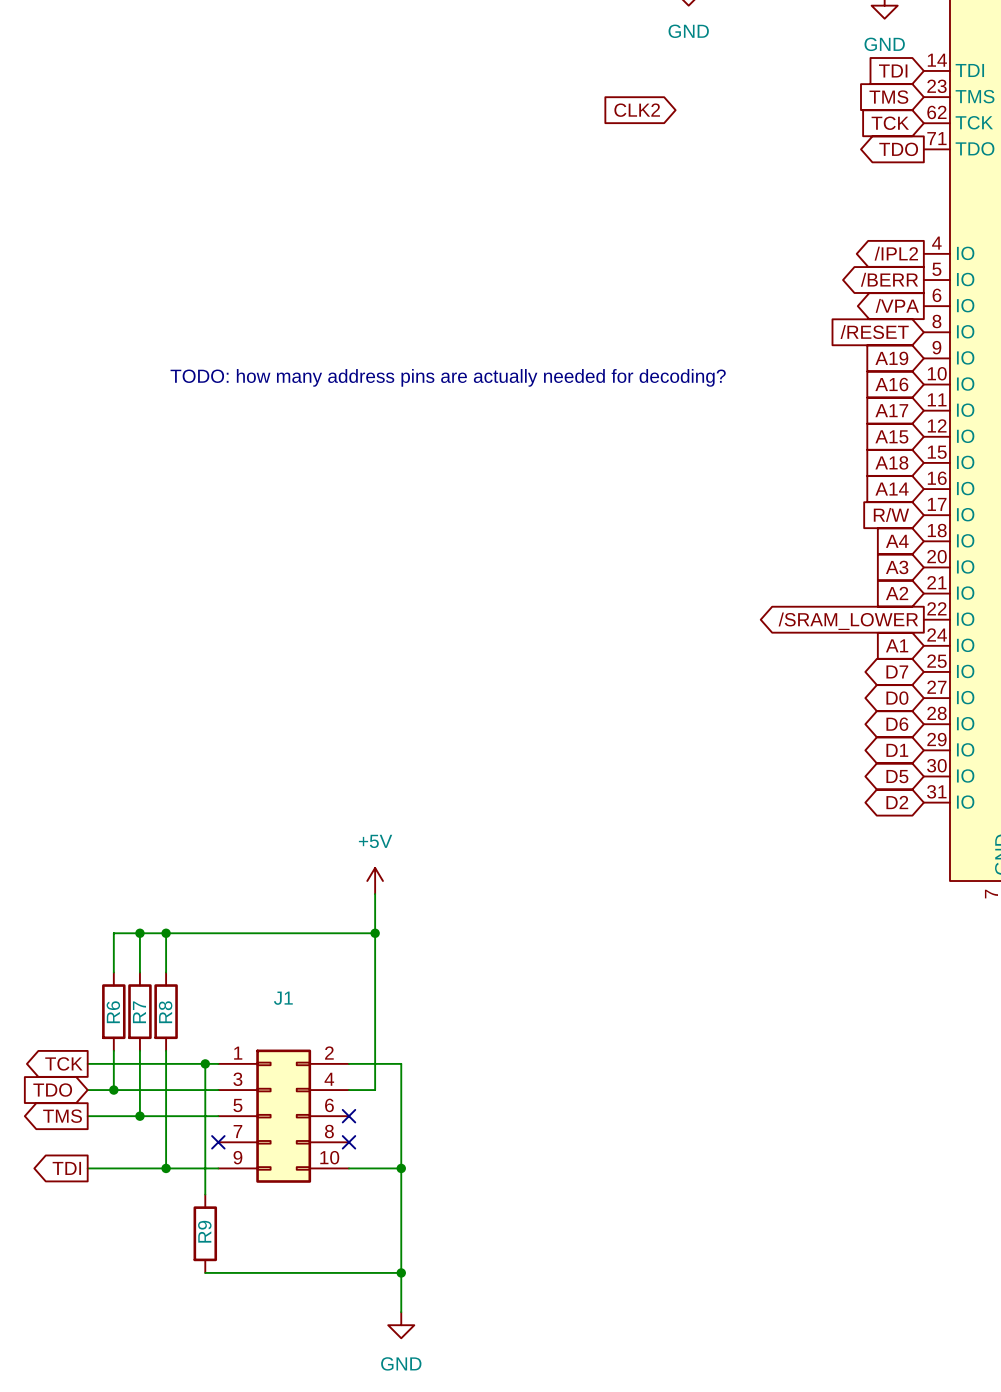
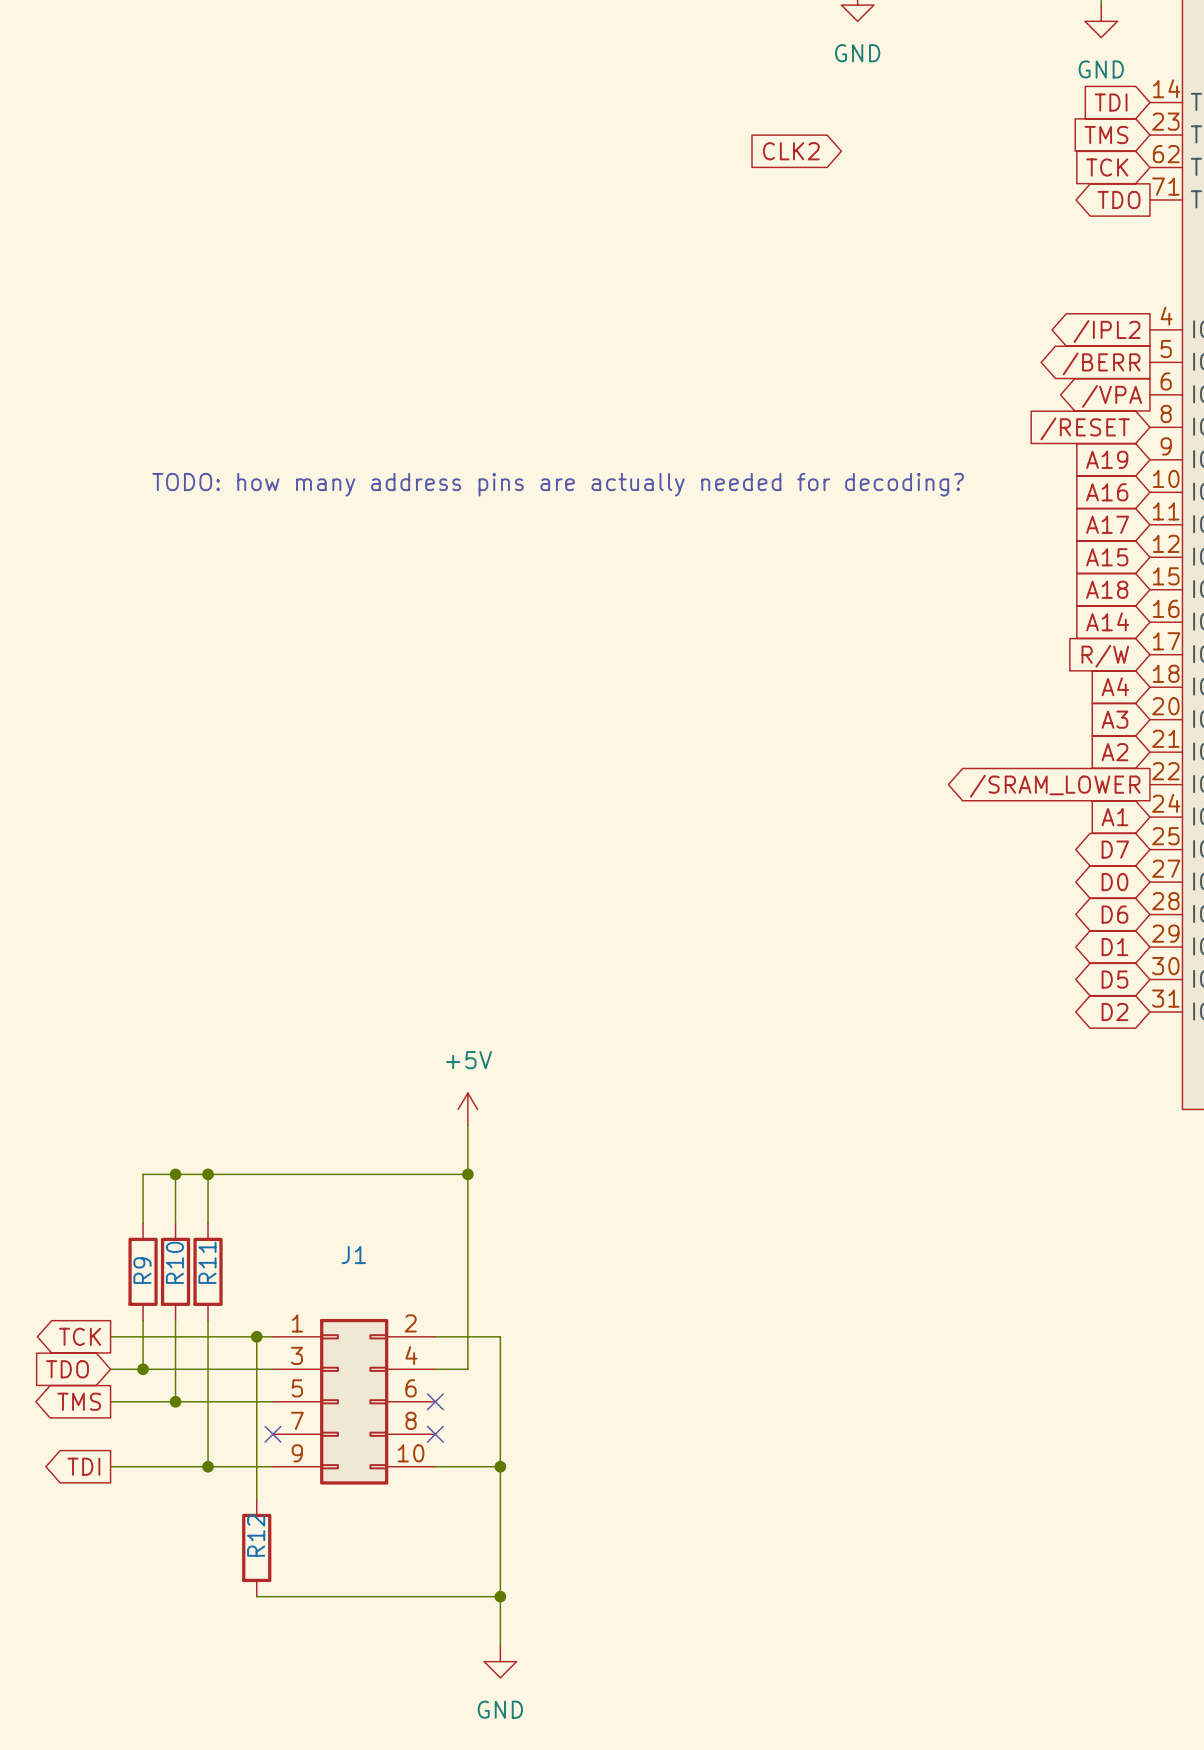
R6 name: R6 (113, 1012) -> R9 (142, 1270)
R7 name: R7 (139, 1012) -> R10 (174, 1262)
R8 name: R8 (165, 1012) -> R11 (207, 1262)
R9 name: R9 (204, 1231) -> R12 (256, 1535)

